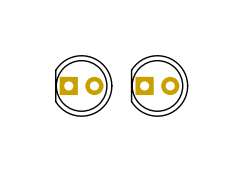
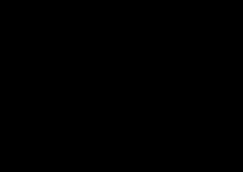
part: (83, 85) -> none
part: (159, 85) -> none

